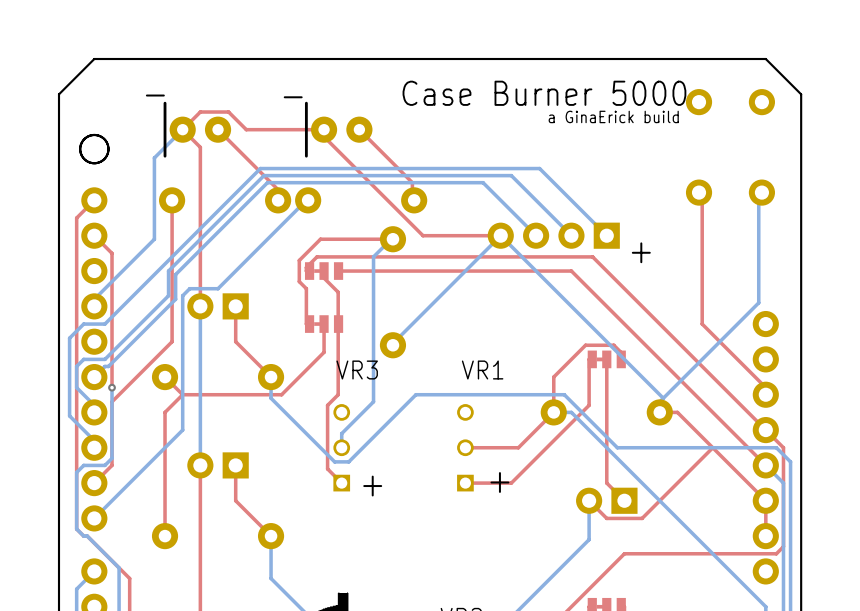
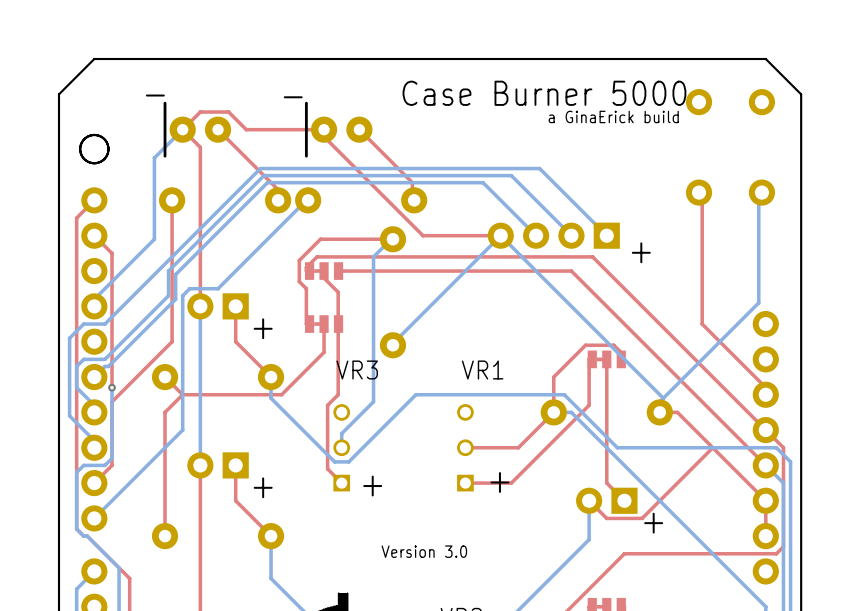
text: none -> + (263, 328)
text: none -> + (263, 487)
text: none -> + (653, 523)
text: none -> Version 3.0 (424, 551)

